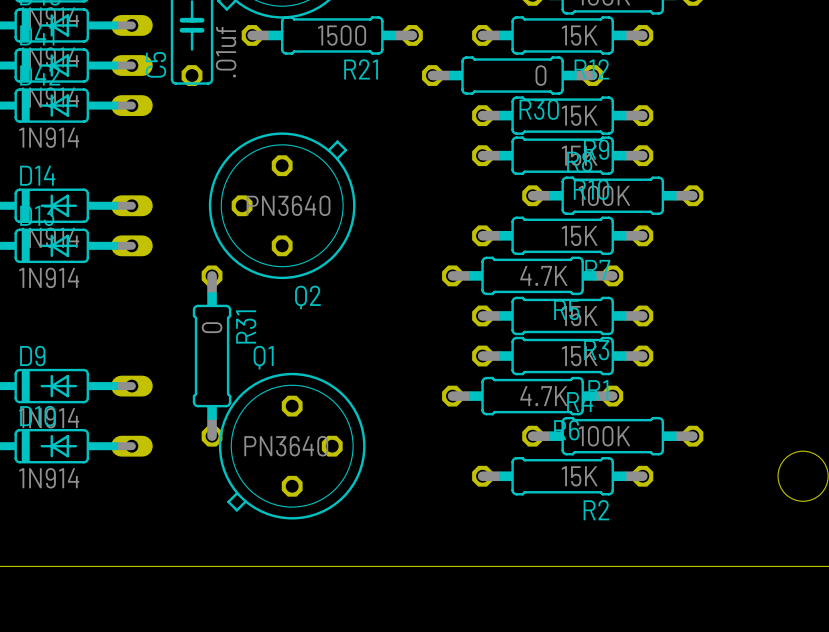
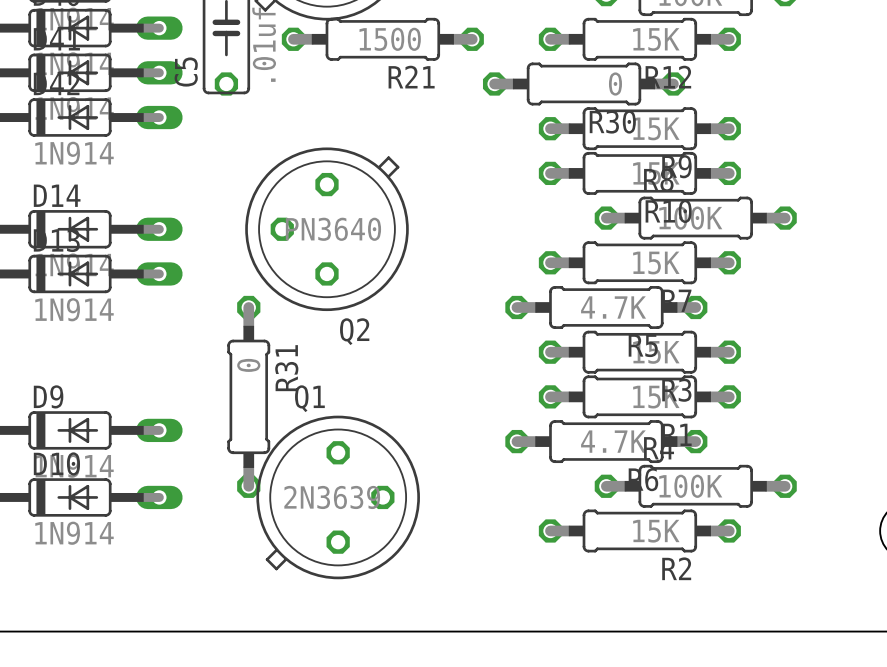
Q1 value: PN3640 (286, 446) -> 2N3639 (332, 497)

